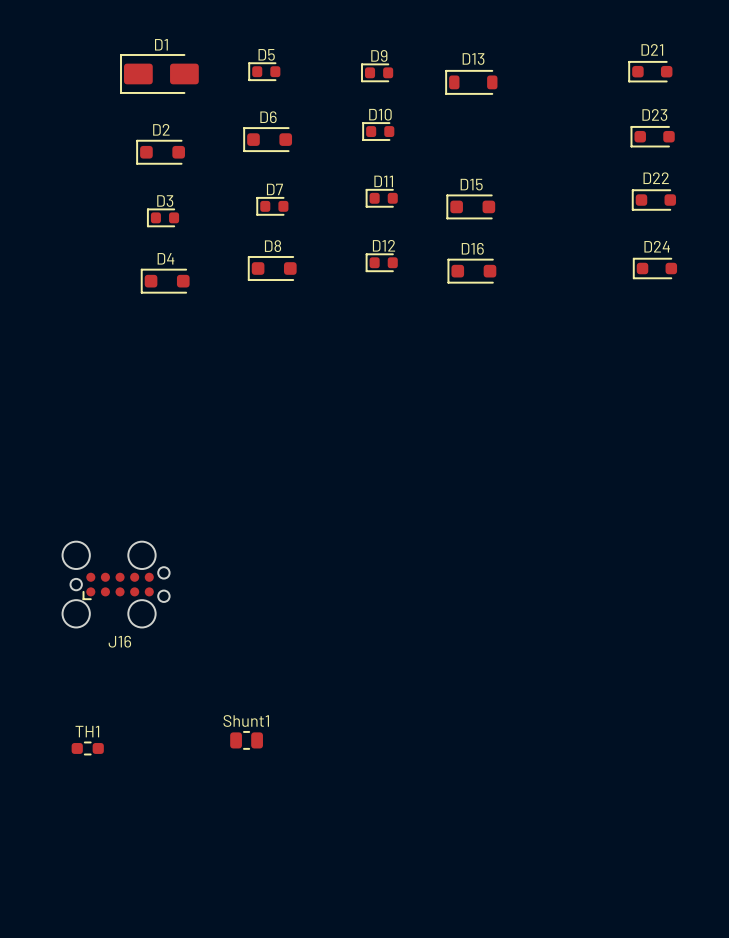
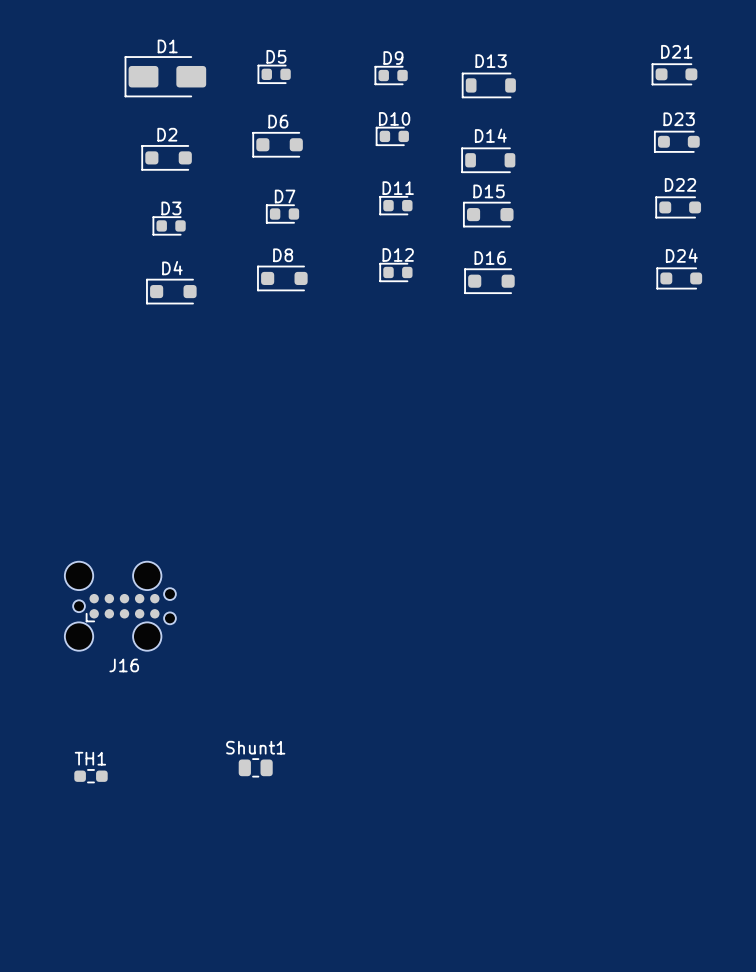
D14: none -> (488, 160)

